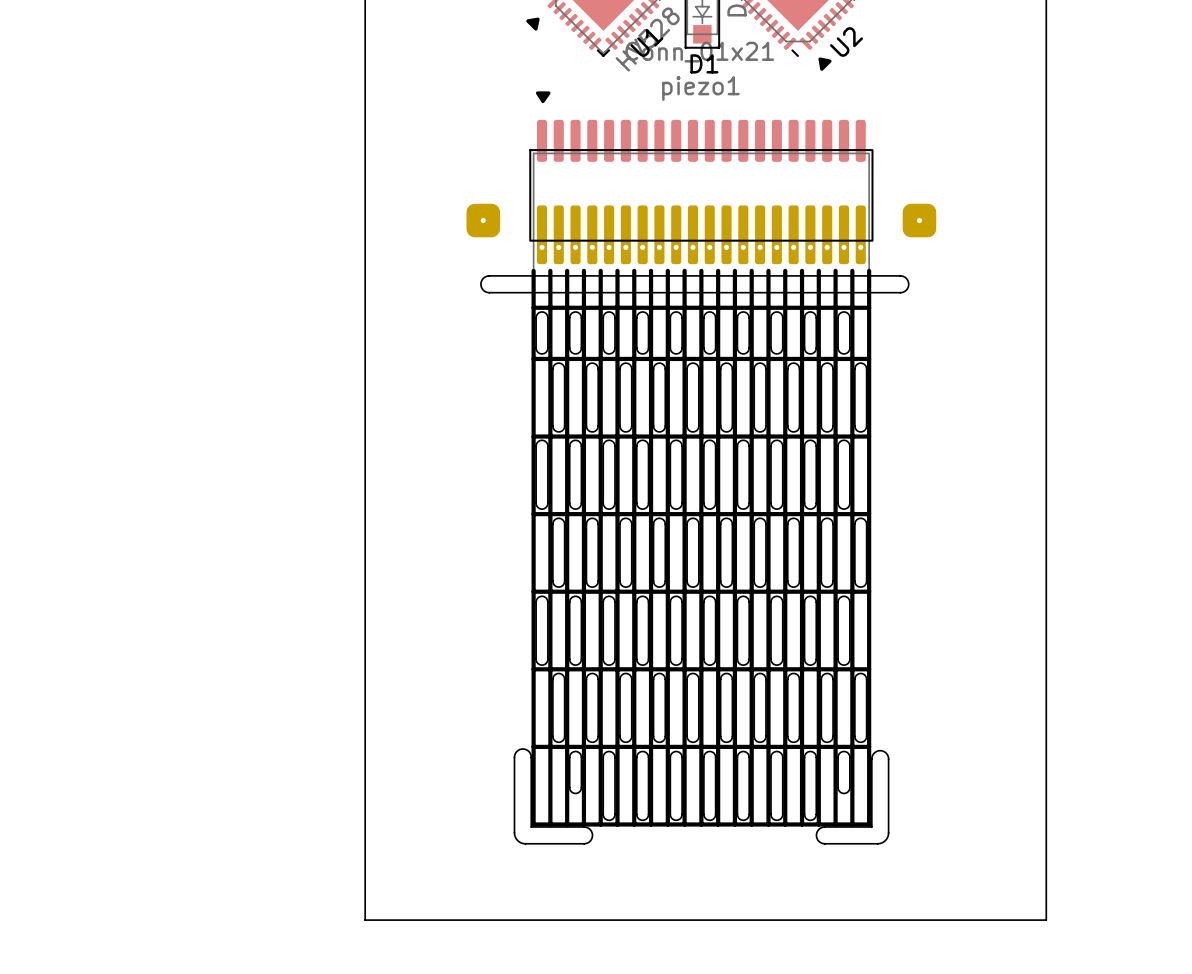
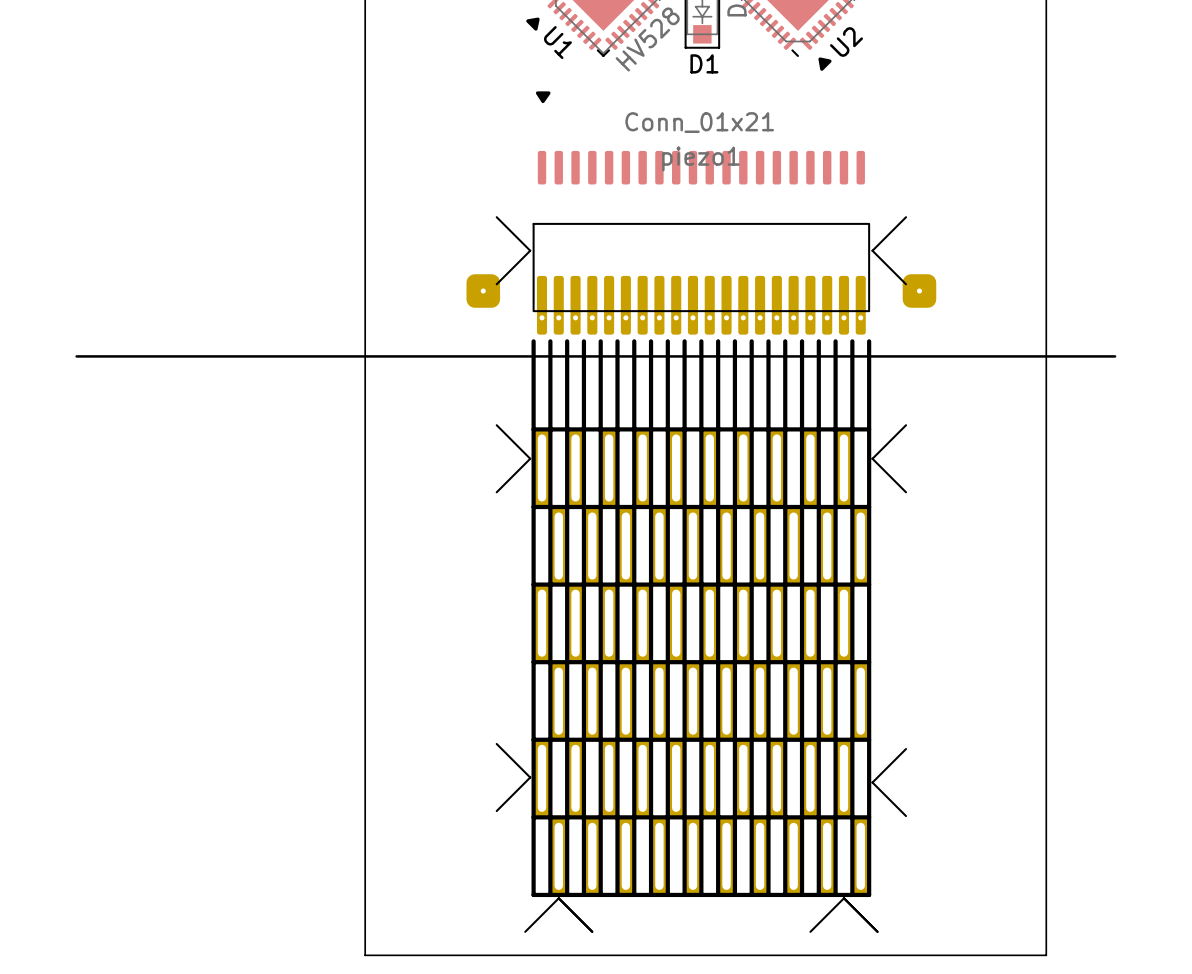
U1 name rotation: 0° (646, 42) -> 90° clockwise (557, 42)
U1 name position: U1 (646, 42) -> U1 (557, 42)
piezo1 footprint: [466, 119, 937, 827] -> [466, 150, 937, 933]
board edge: (489, 275) (900, 275) (906, 278) (908, 284) (906, 290) (900, 292) (489, 292) (483, 290) (480, 284) (483, 278) (489, 275) -> none
board edge: none -> (76, 356) (1115, 356)
board edge: (514, 757) (514, 832) (517, 840) (525, 843) (584, 843) (590, 841) (592, 833) (586, 827) (531, 827) (530, 755) (527, 750) (521, 749) (516, 752) (514, 757) -> none
board edge: (871, 759) (871, 827) (822, 827) (816, 833) (820, 842) (877, 843) (887, 838) (888, 757) (885, 752) (880, 750) (874, 753) (871, 759) -> none
board edge: (365, 920) (1046, 920) -> (365, 920) (365, 955) (1046, 955) (1046, 920)

